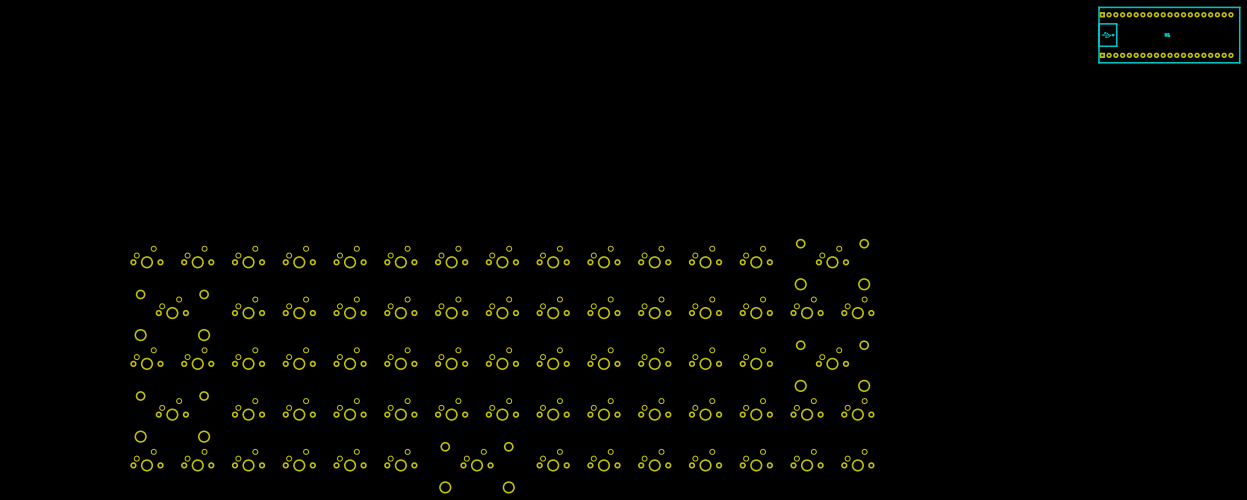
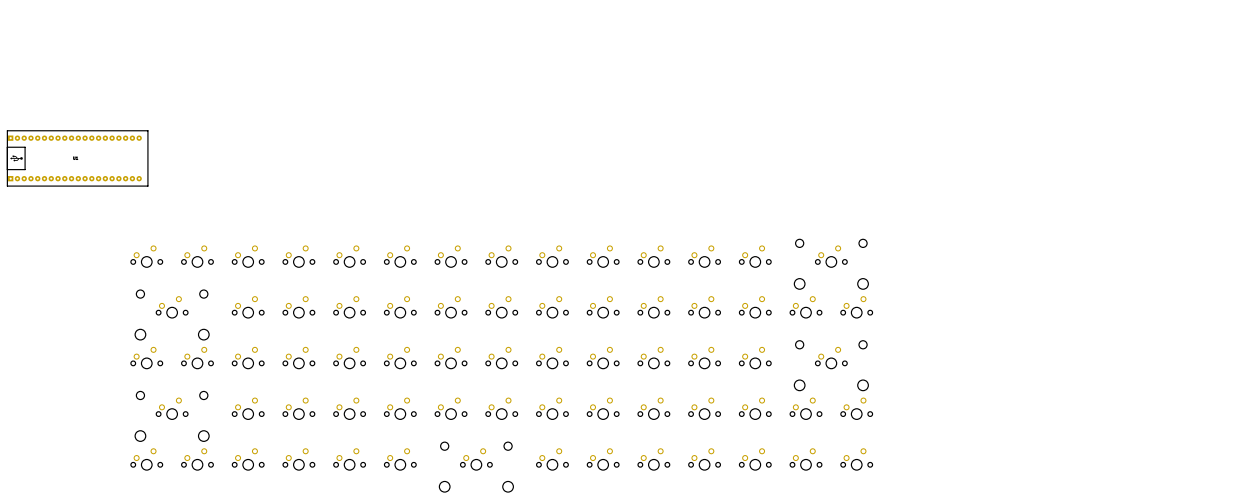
part position: (1169, 35) -> (77, 158)

